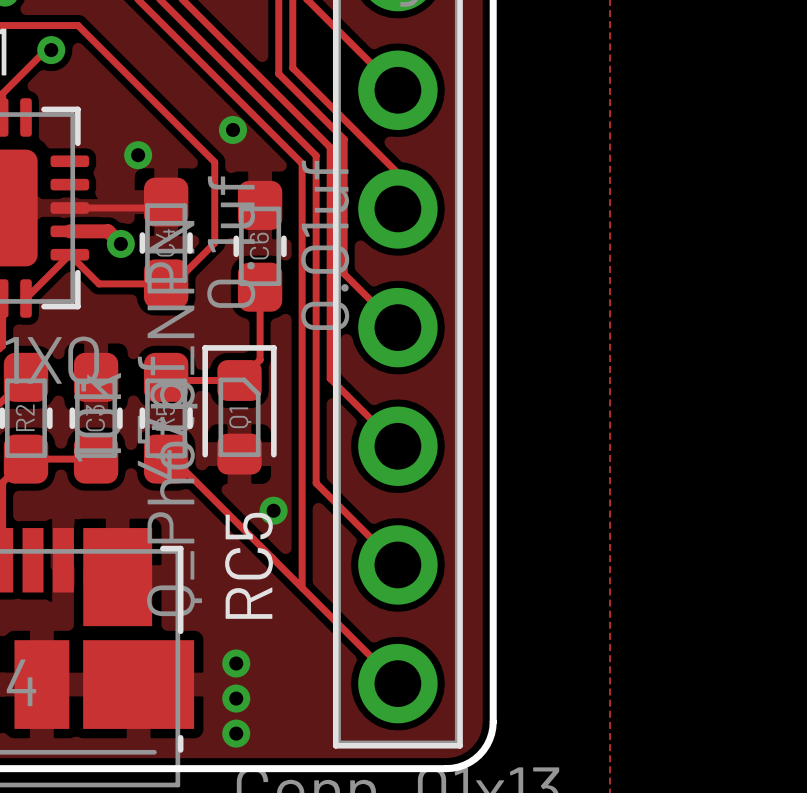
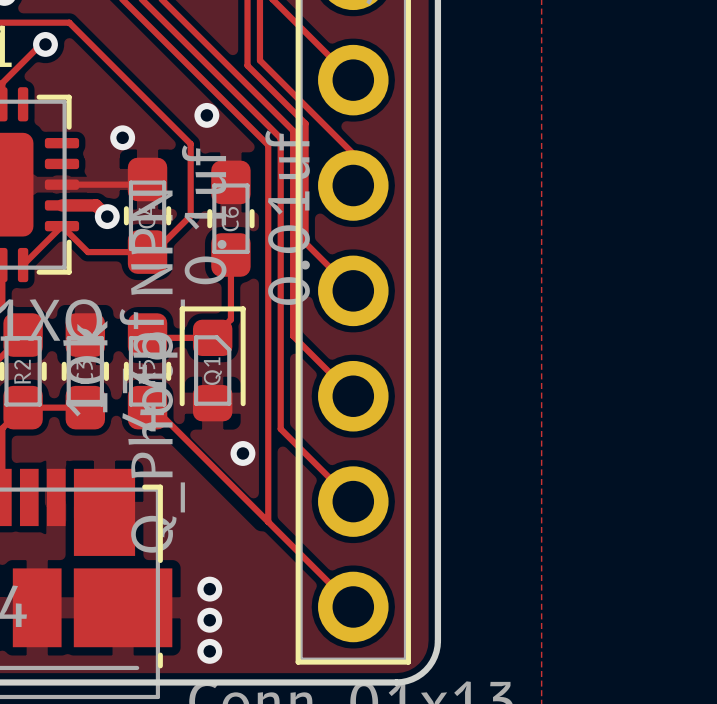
text: RC5 (249, 565) -> none

